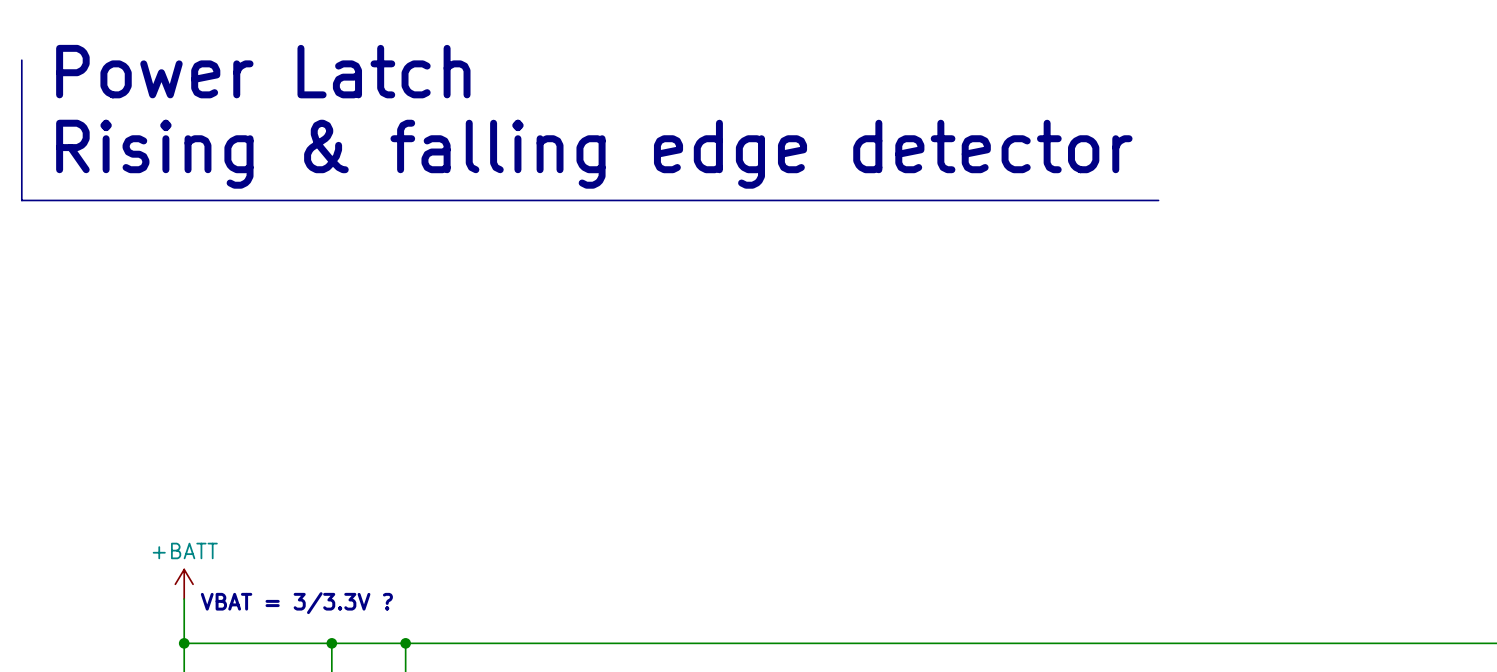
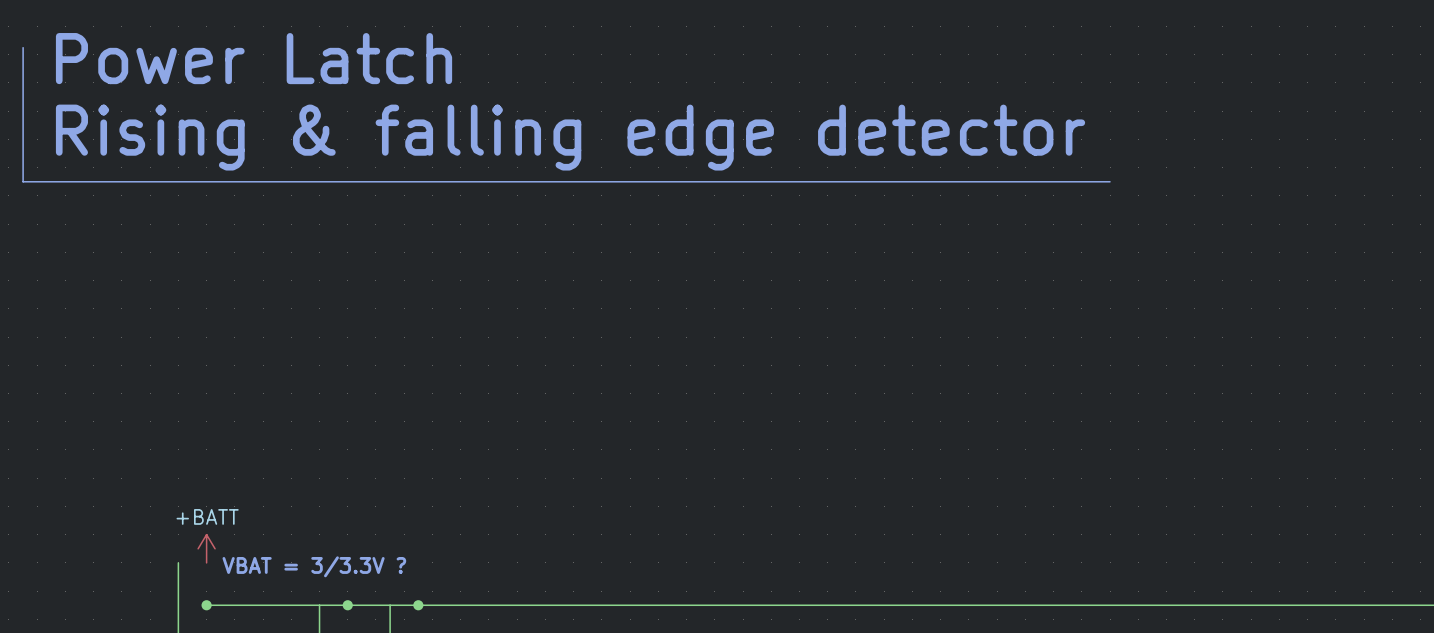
power symbol position: +BATT (184, 584) -> +BATT (206, 548)
text position: VBAT = 3/3.3V ? (296, 603) -> VBAT = 3/3.3V ? (314, 566)
wire: (184, 643) (213, 643) -> none
junction position: (184, 643) -> (206, 605)
junction: (331, 643) -> none
junction: none -> (347, 605)
junction: (405, 643) -> none
junction: none -> (418, 605)

